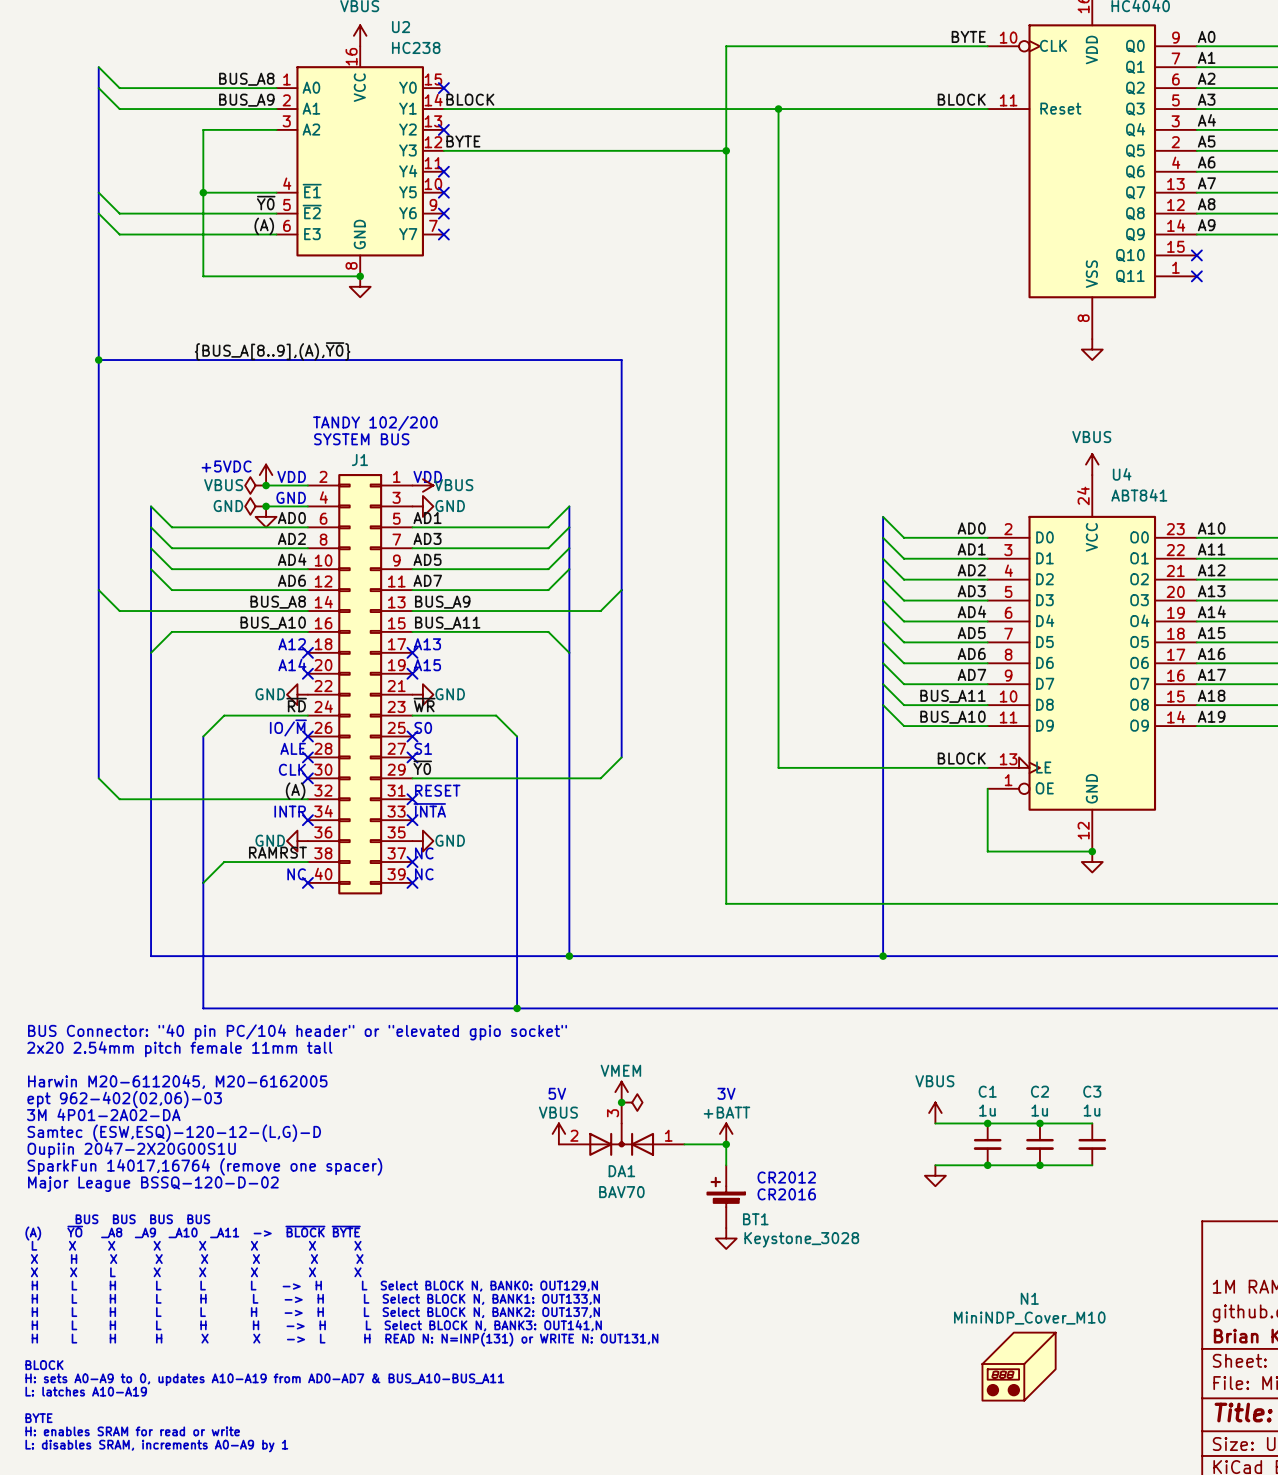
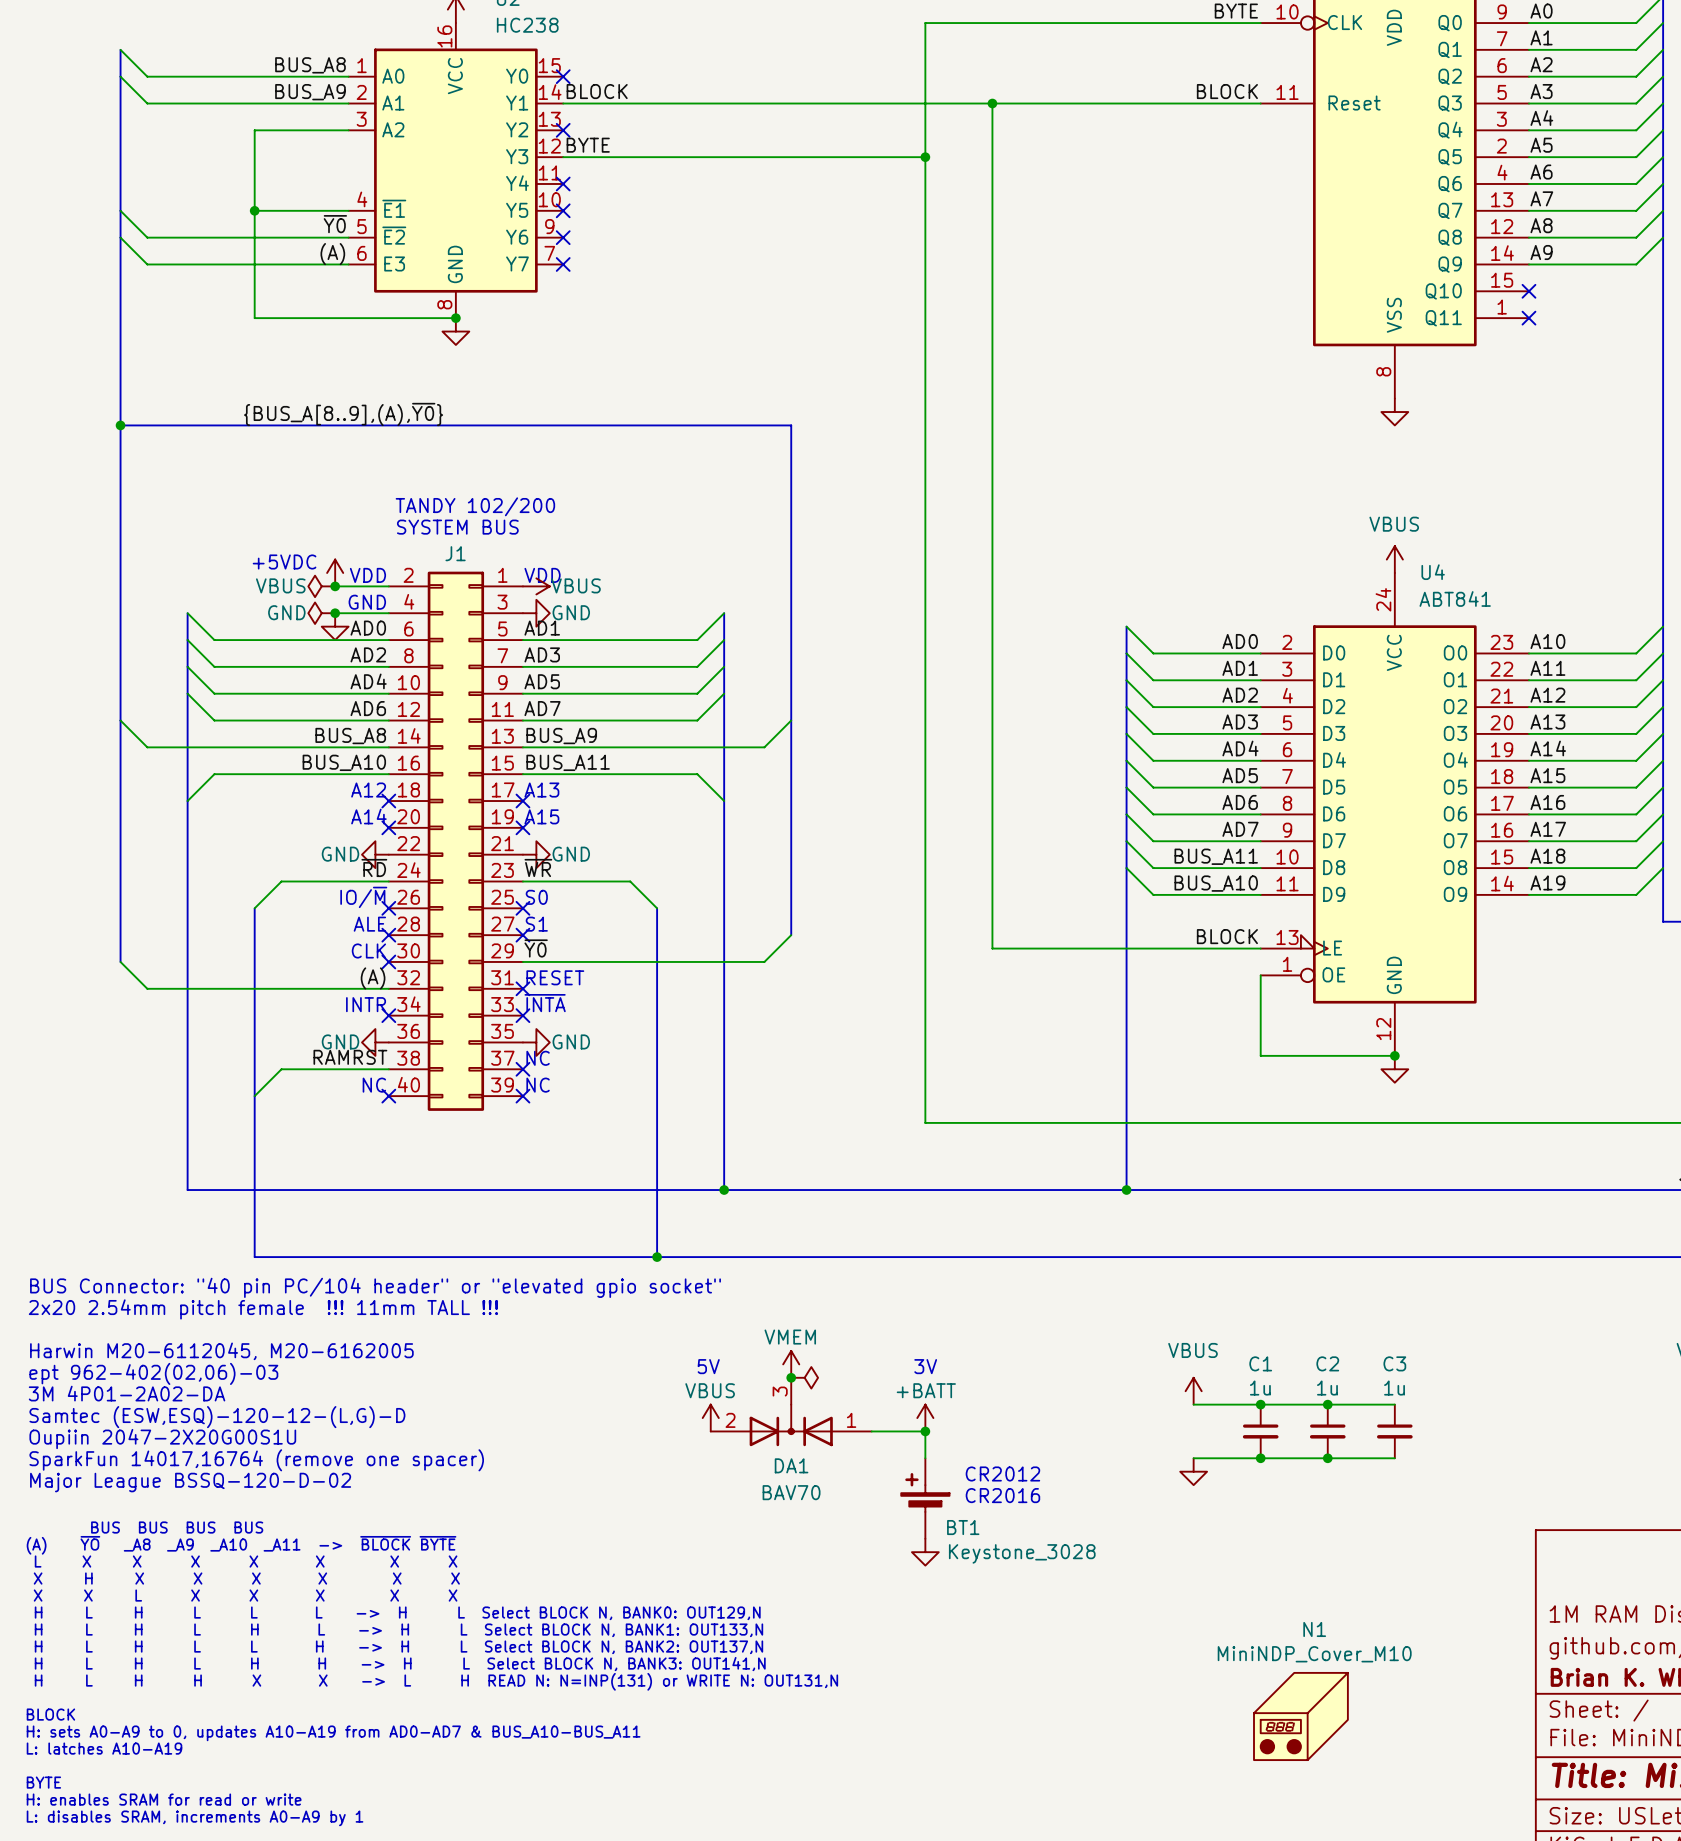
text: 2x20 2.54mm pitch female 11mm tall (179, 1049) -> 2x20 2.54mm pitch female !!! 11mm TALL !!! (263, 1309)

